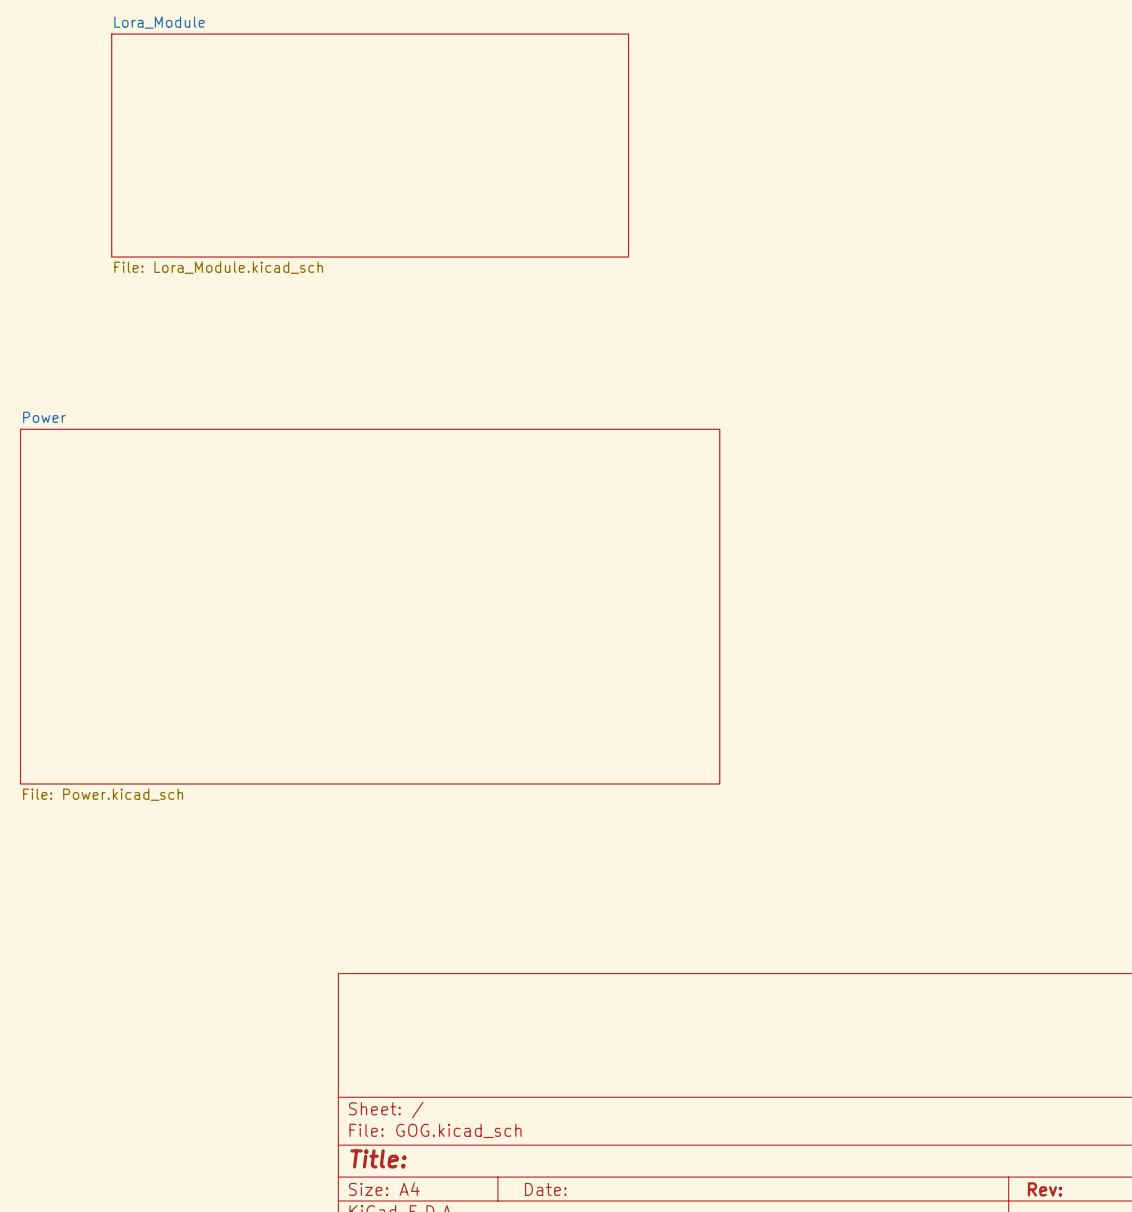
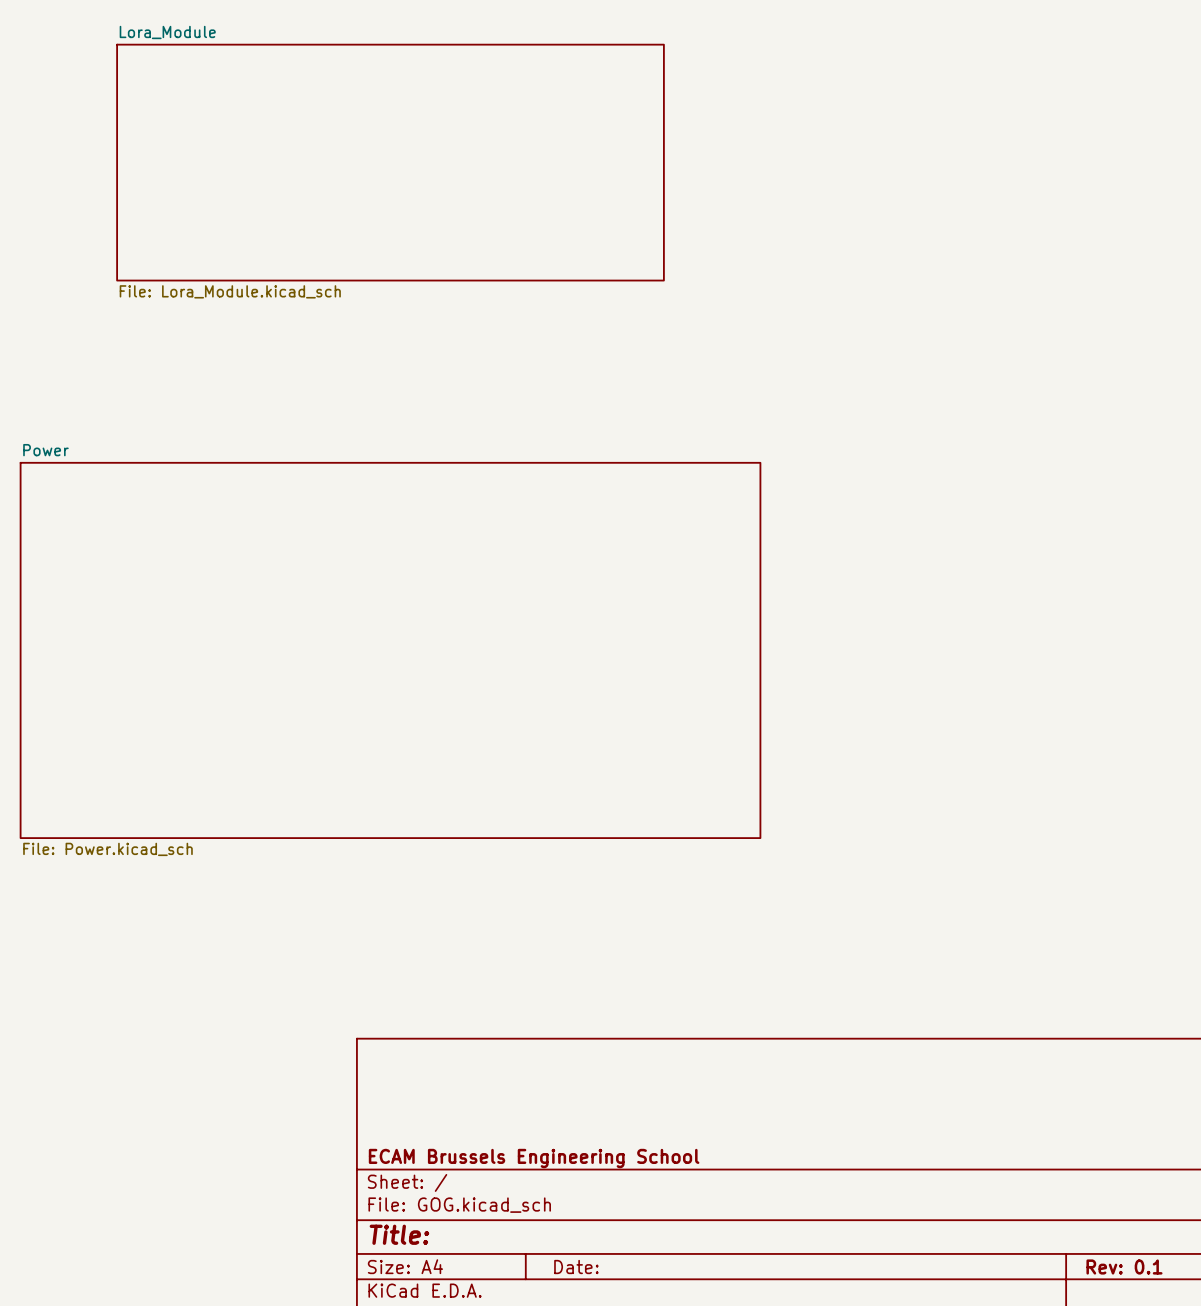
title block: none -> ECAM Brussels Engineering School (534, 1158)
title block: Rev: (1045, 1189) -> Rev: 0.1 (1124, 1267)

